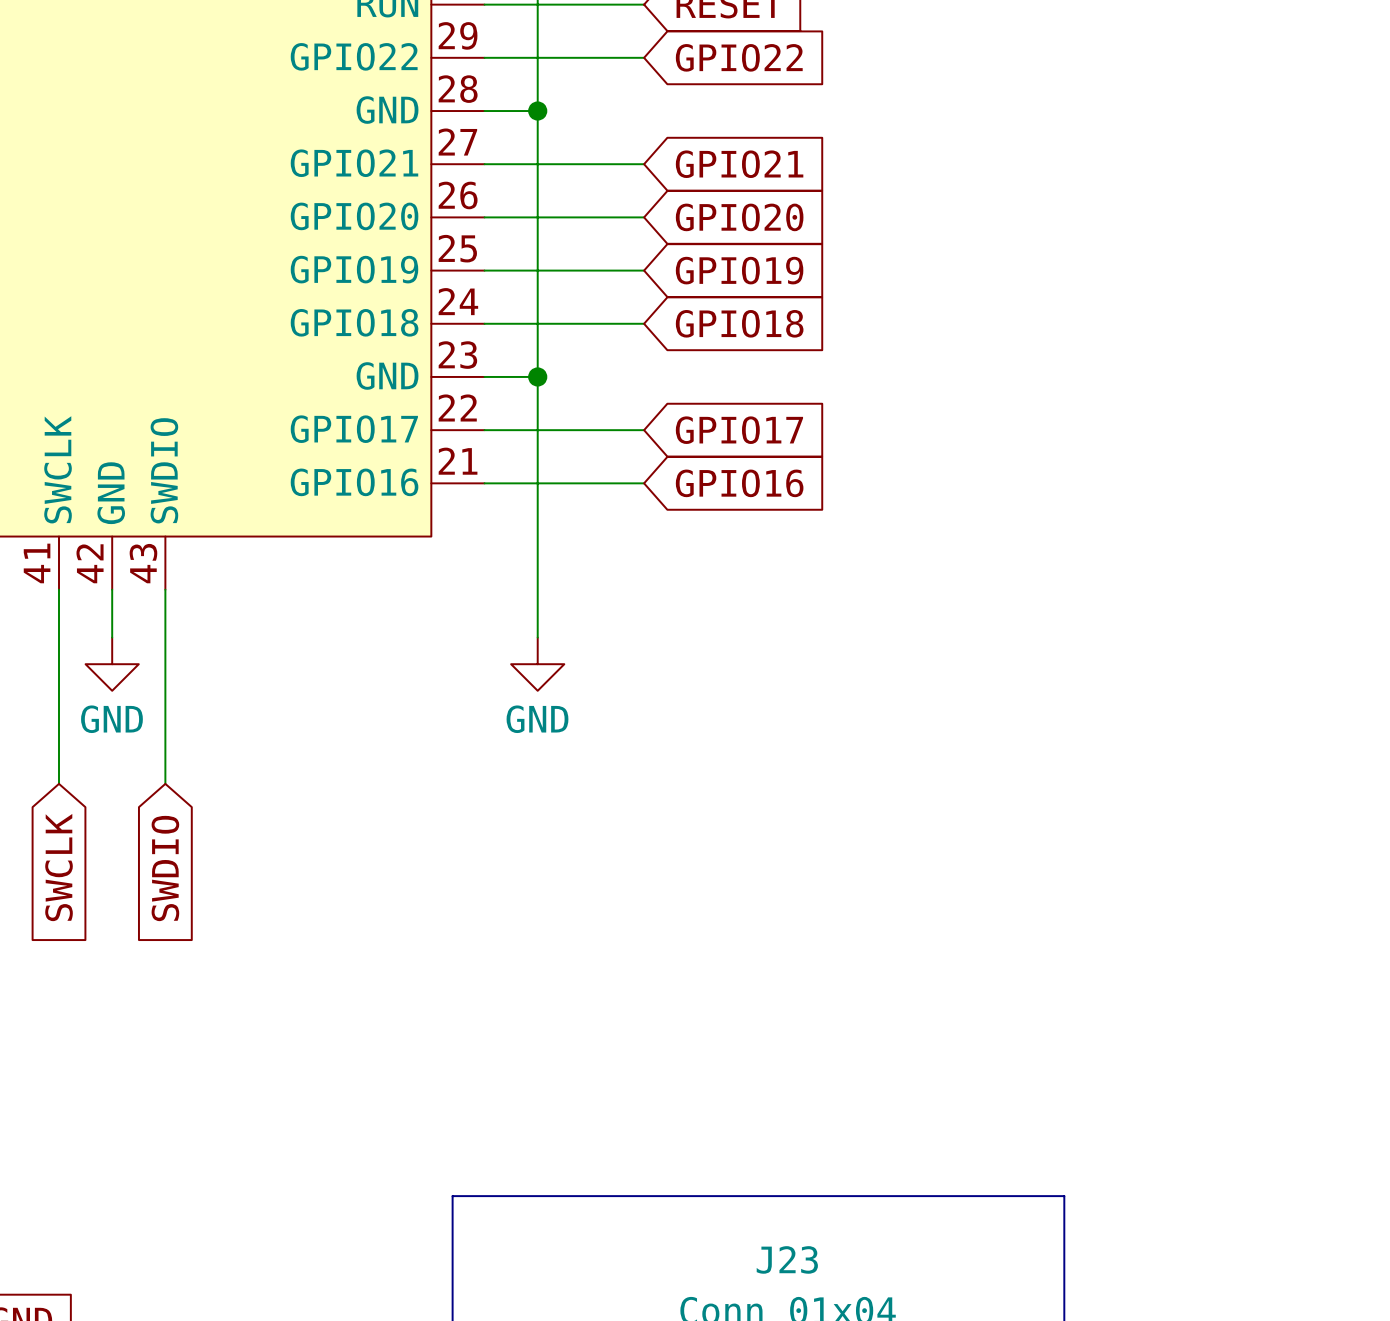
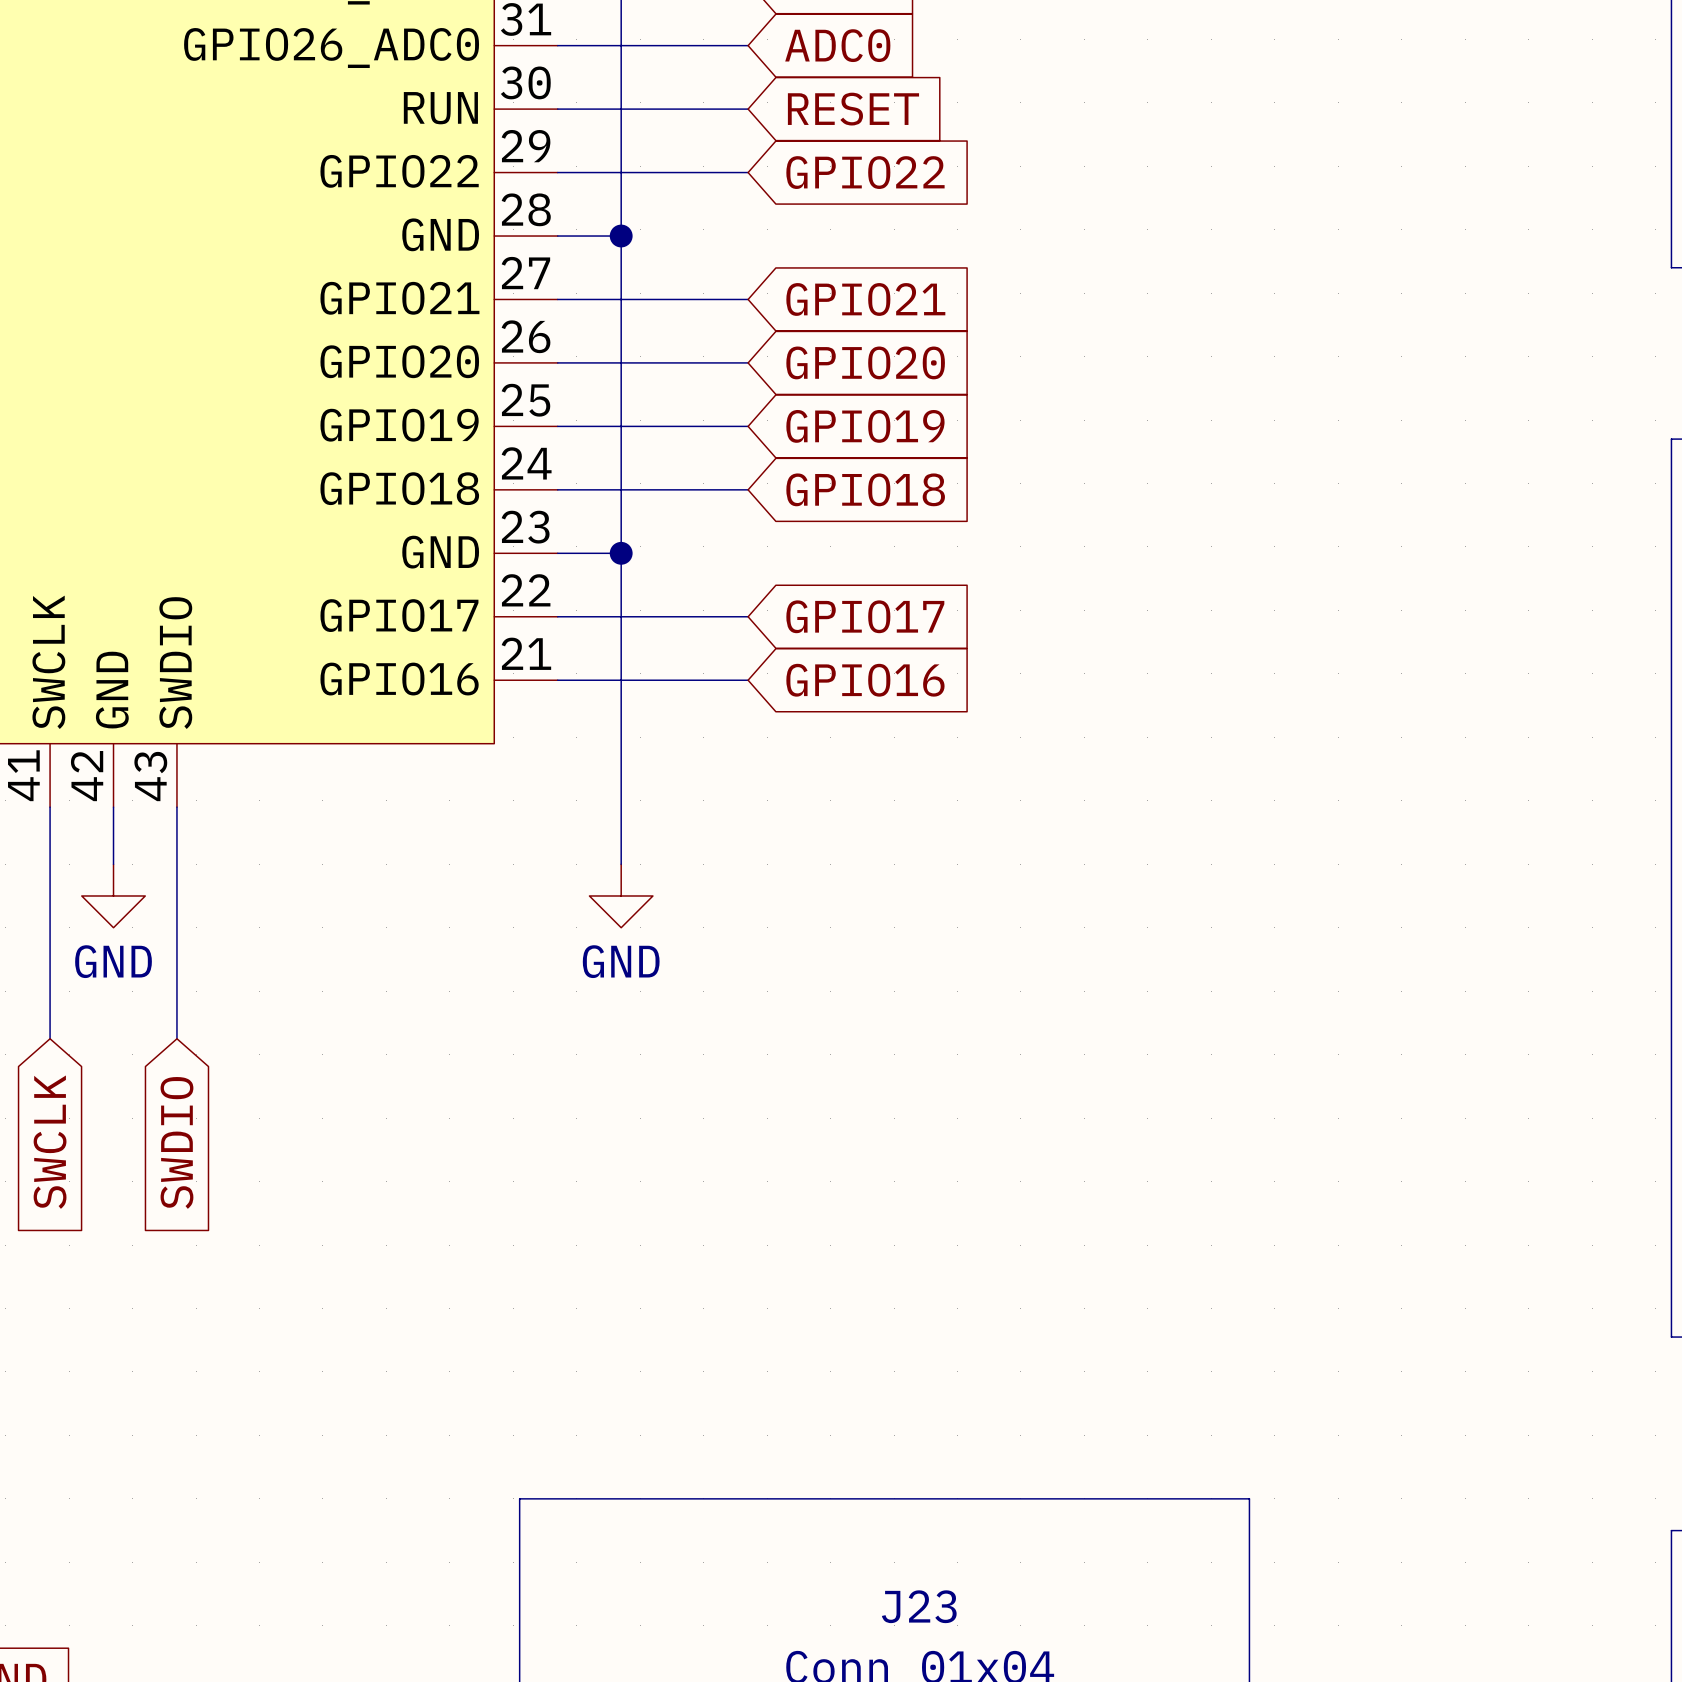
line: (452, 1196) (1064, 1196) -> (519, 1530) (519, 1498) (1249, 1498) (1249, 1530)

